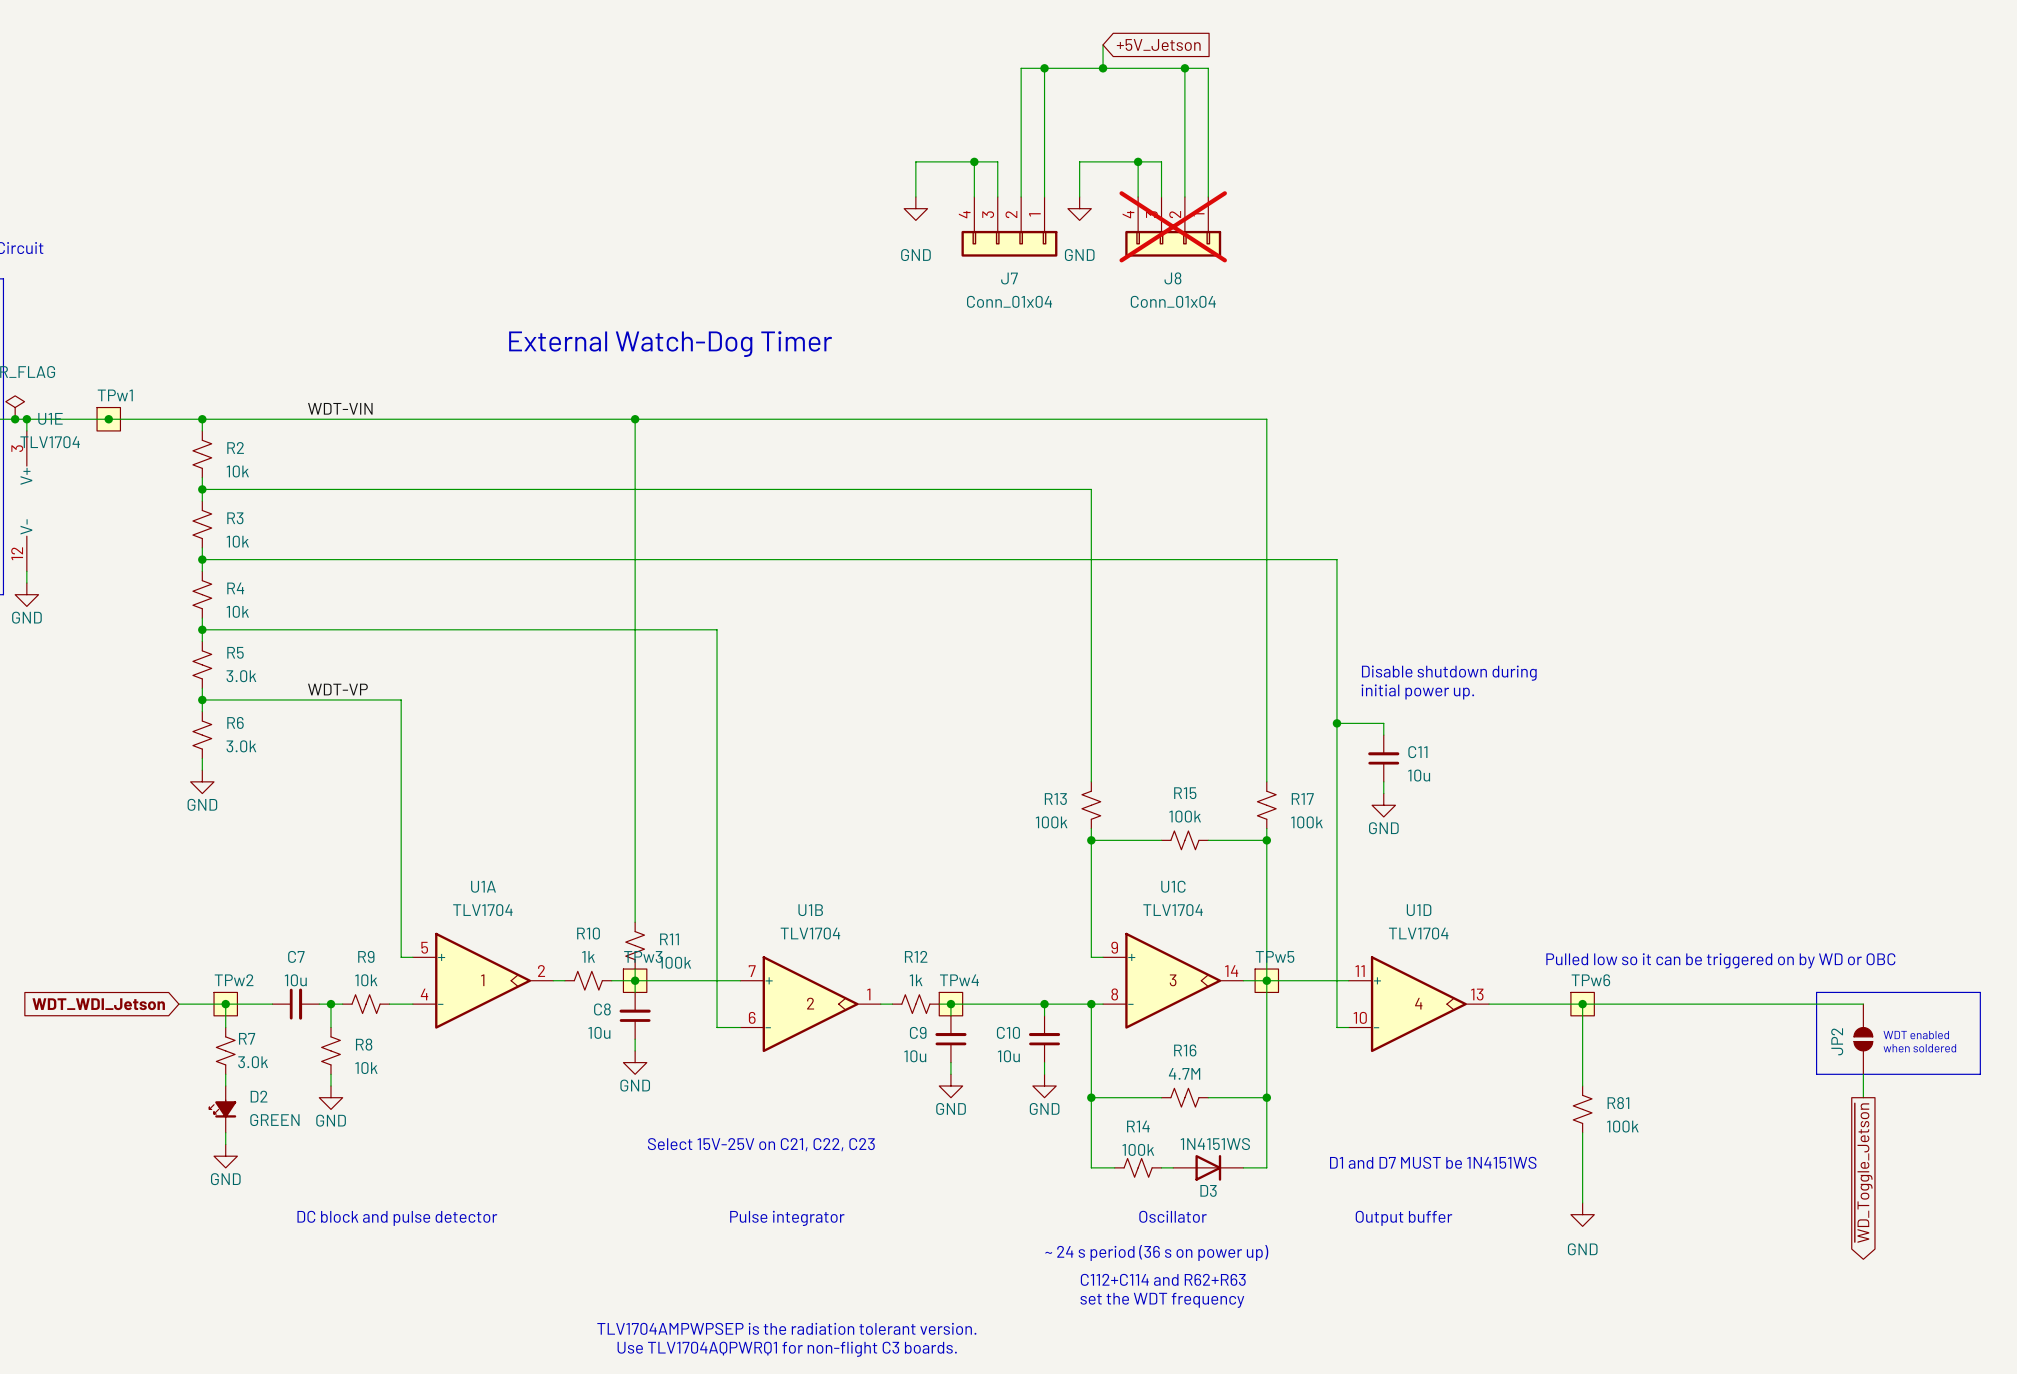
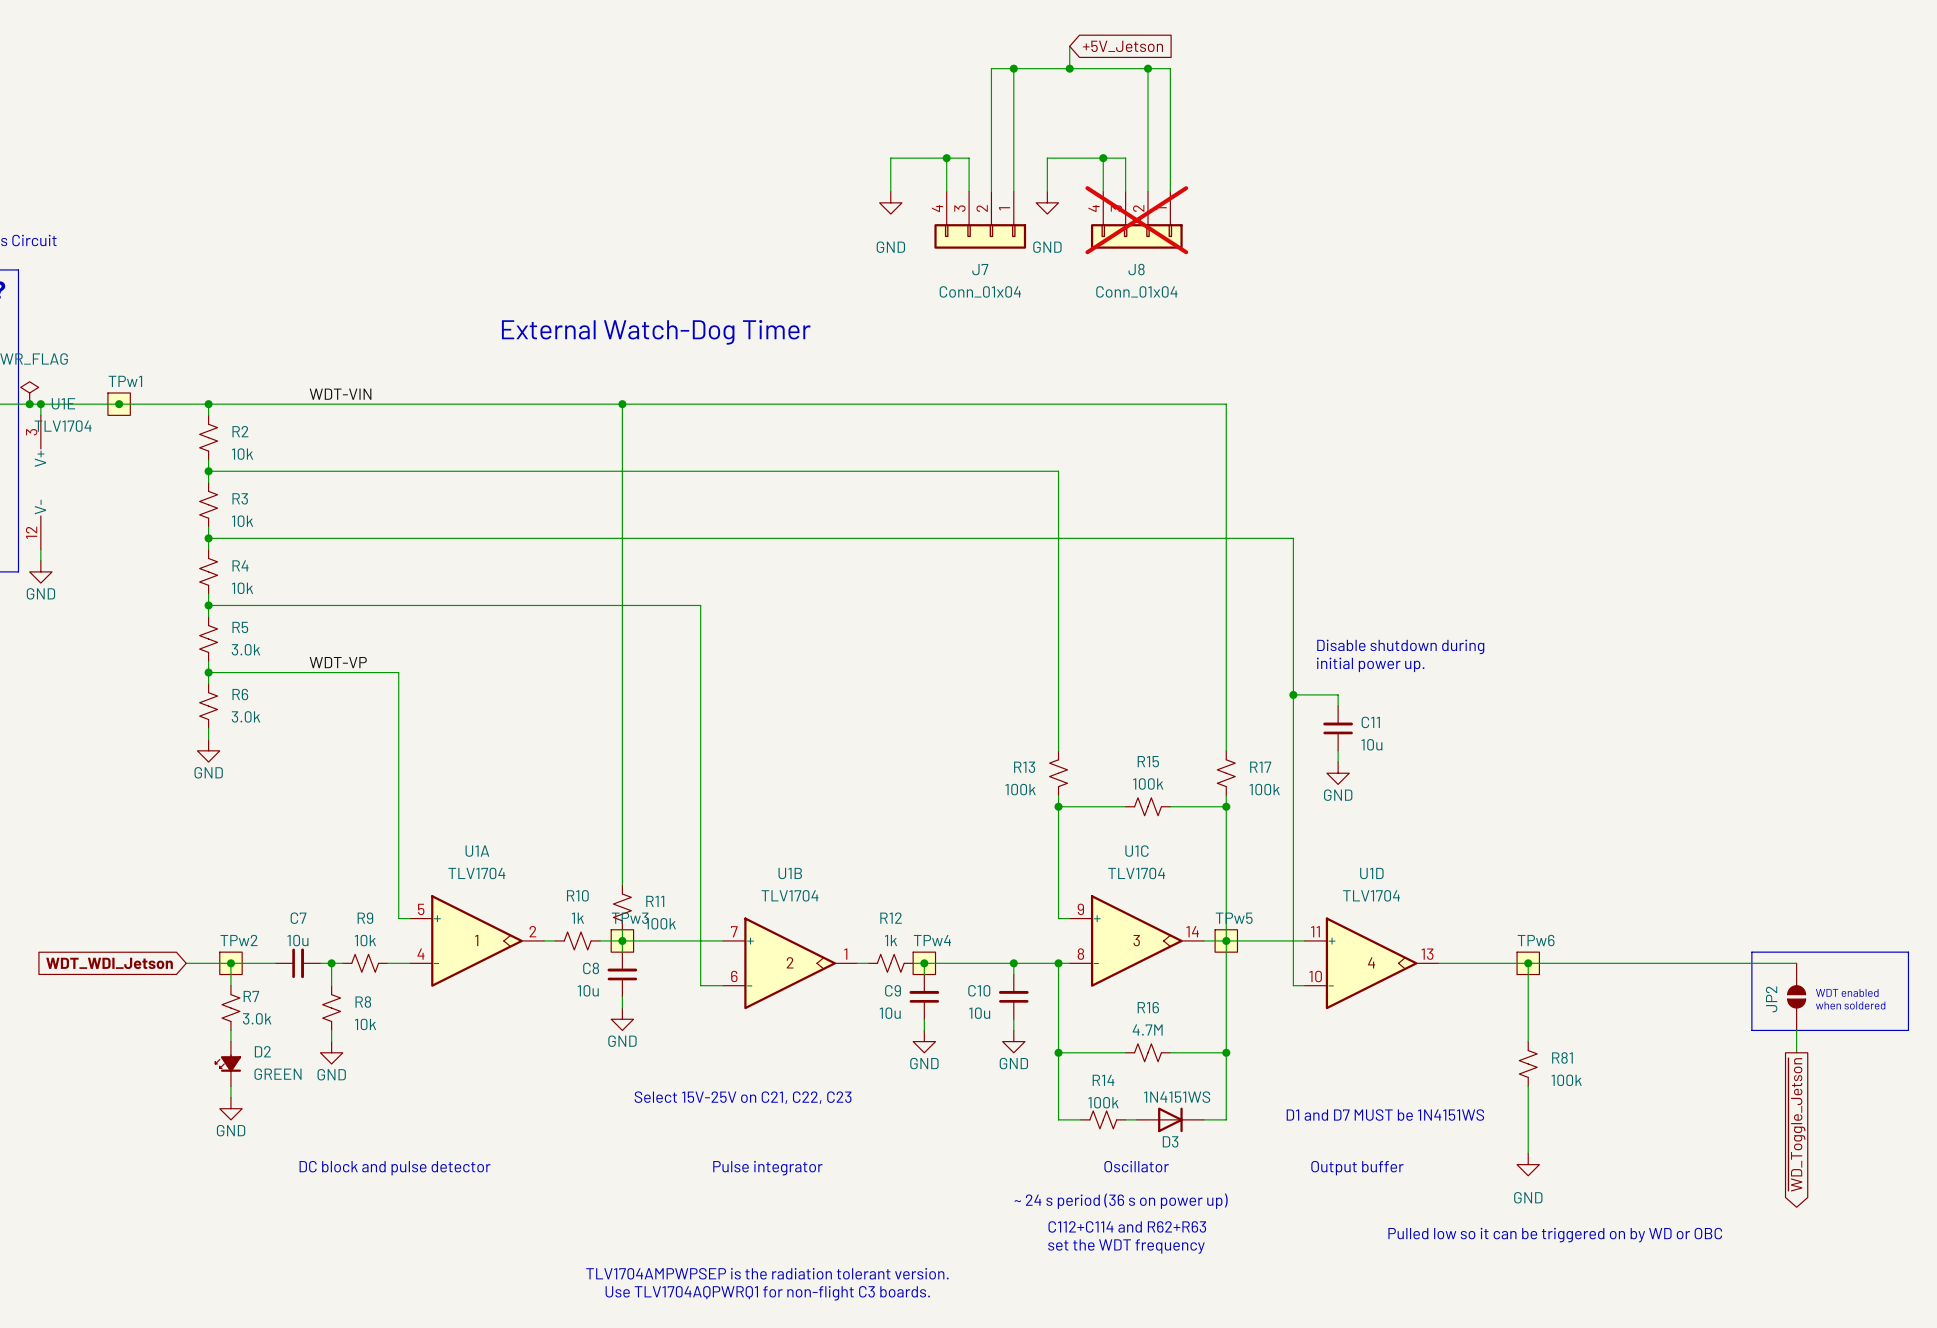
text: Pulled low so it can be triggered on by WD or OBC (1720, 960) -> none
text: none -> Pulled low so it can be triggered on by WD or OBC (1555, 1235)

